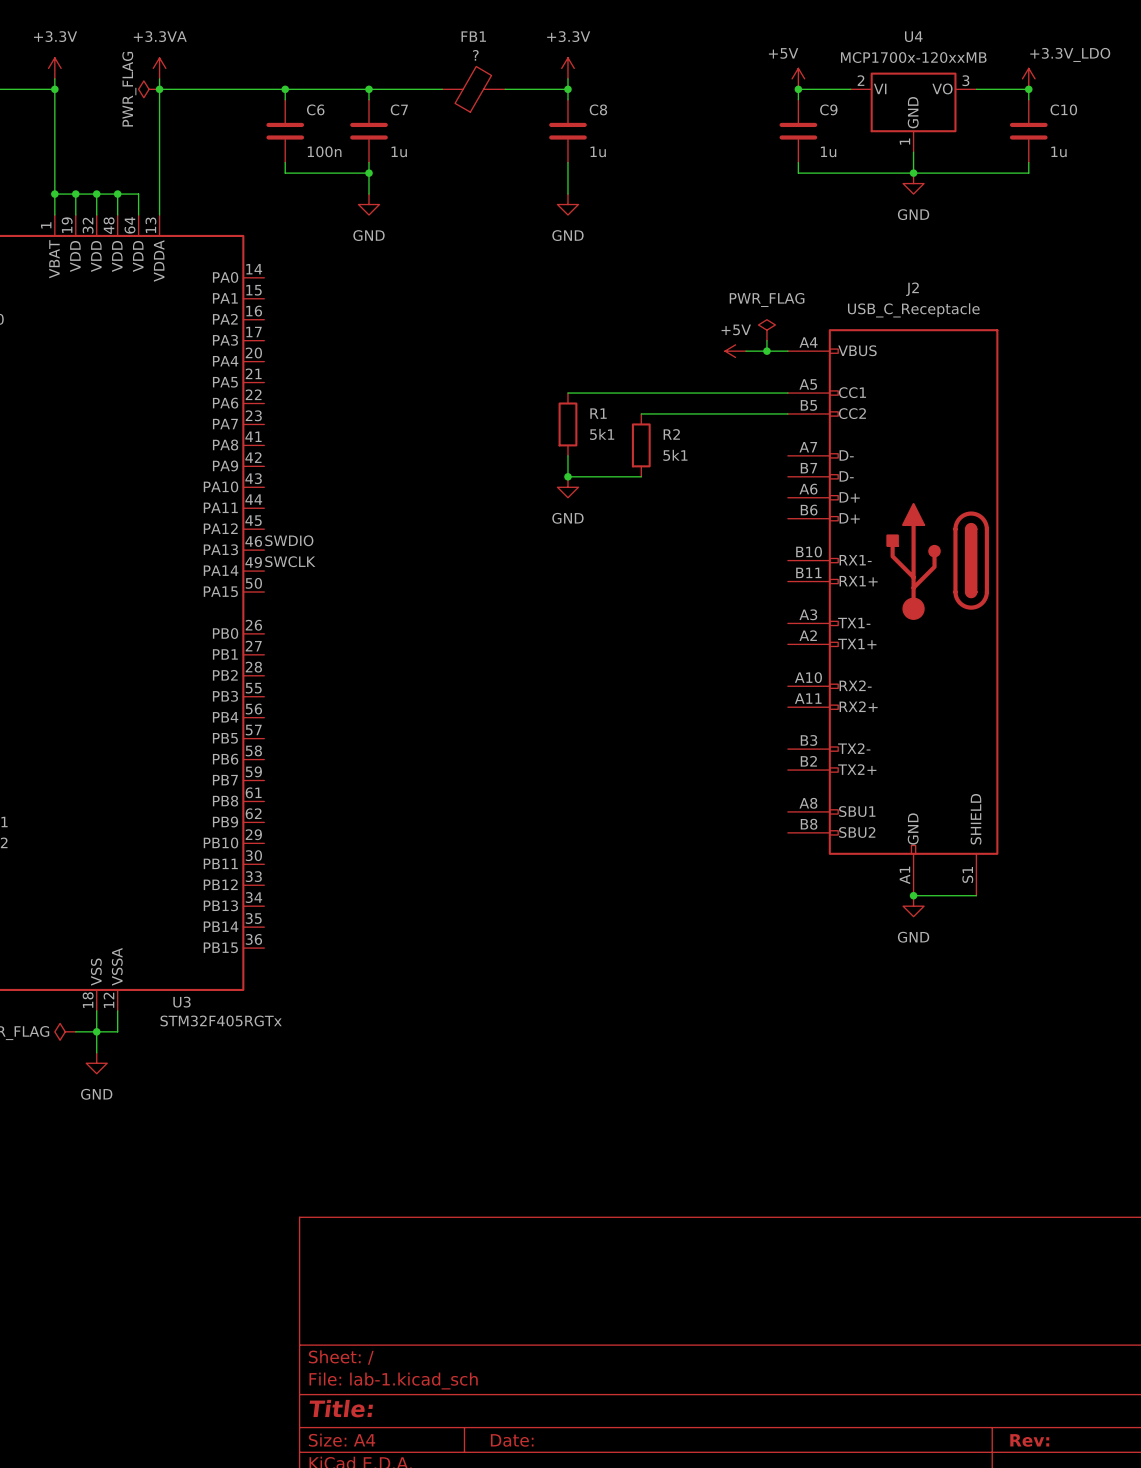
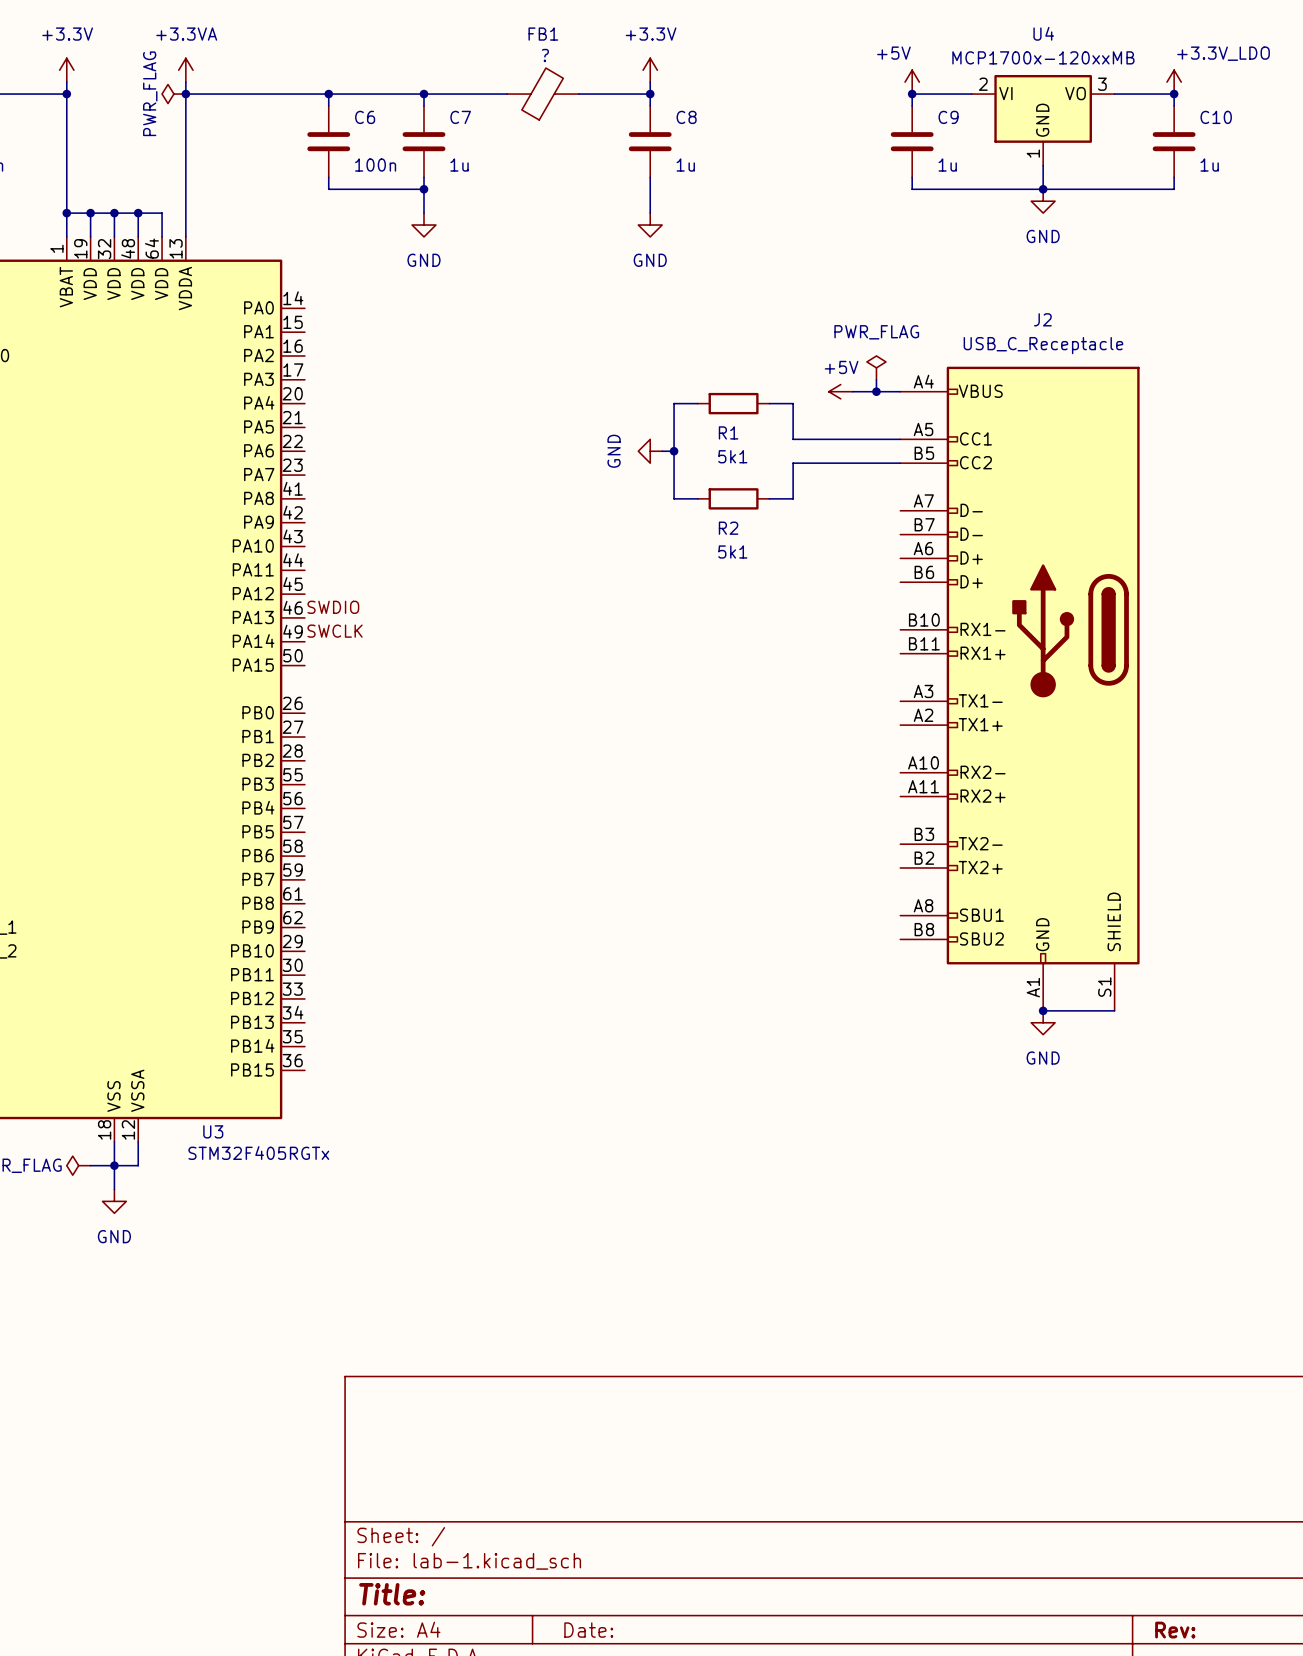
wire: none -> (697, 403) (674, 403) (674, 498) (697, 498)
wire: (567, 393) (693, 393) -> (769, 403) (793, 403) (793, 439)
wire: none -> (662, 451) (674, 451)
junction: none -> (674, 451)
wire: (641, 413) (693, 413) -> (769, 498) (793, 498) (793, 463)
R1 rotation: 0° (567, 424) -> 90° clockwise (733, 403)
R1 position: (567, 424) -> (733, 403)
R2 rotation: 0° (641, 445) -> 90° clockwise (733, 498)
wire: (567, 455) (567, 476) (641, 476) -> none
junction: (567, 476) -> none
power symbol rotation: 0° (567, 487) -> 90° clockwise (650, 451)
power symbol position: GND (567, 487) -> GND (650, 451)

